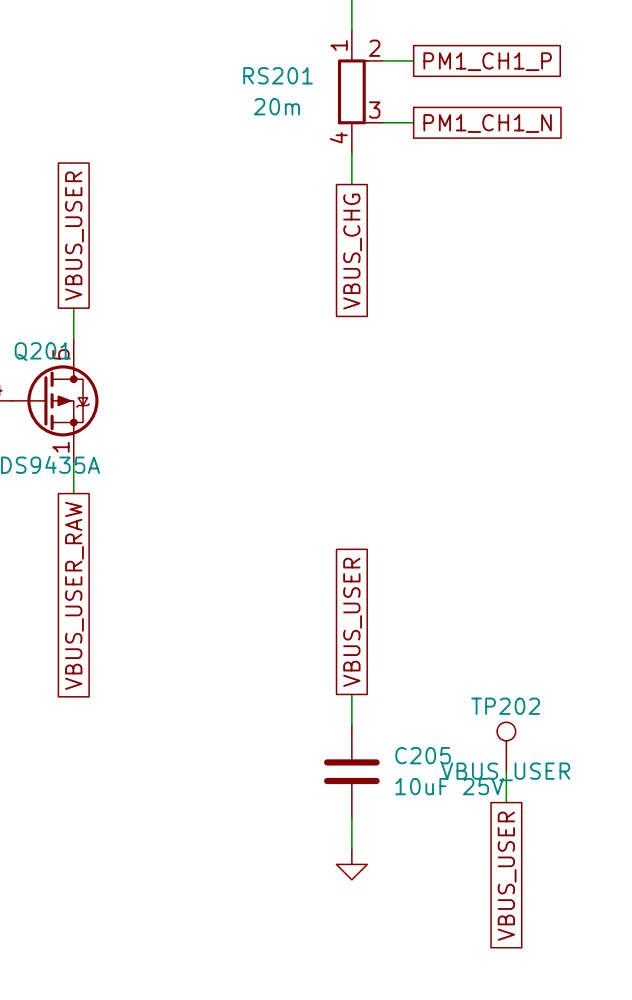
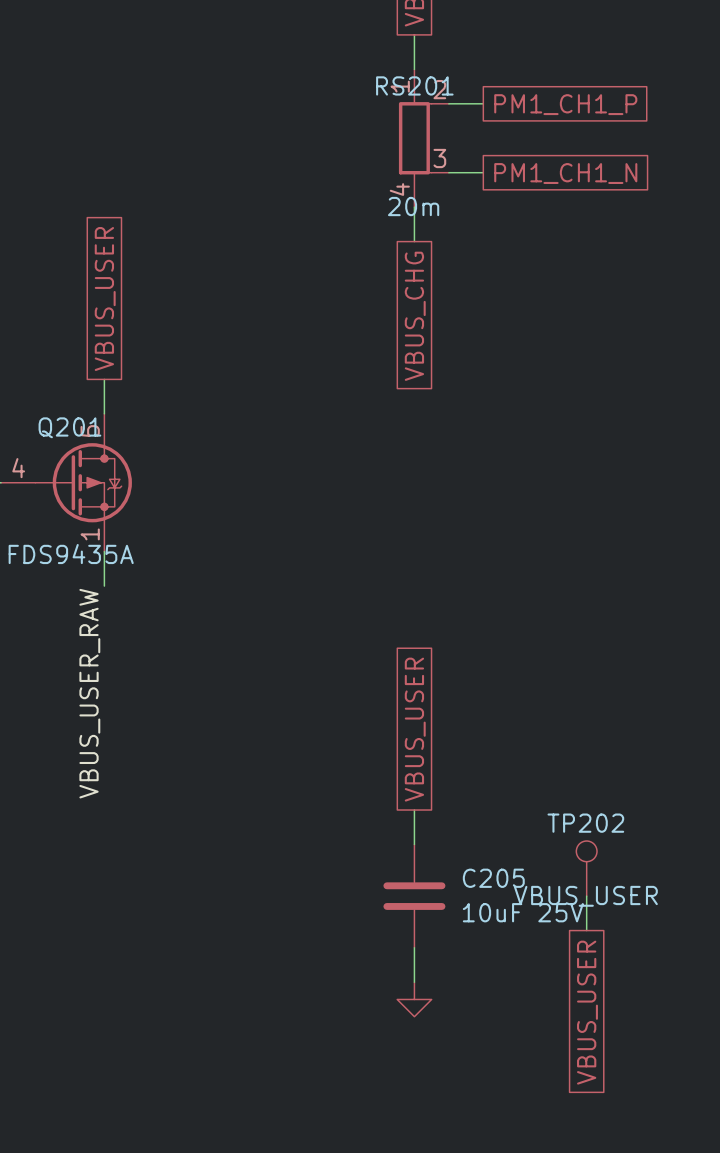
RS201 name position: RS201 (278, 75) -> RS201 (414, 85)
RS201 value position: 20m (276, 106) -> 20m (413, 206)
label: none -> VBUS_USER_RAW (89, 693)
global label: VBUS_USER_RAW (74, 595) -> none

